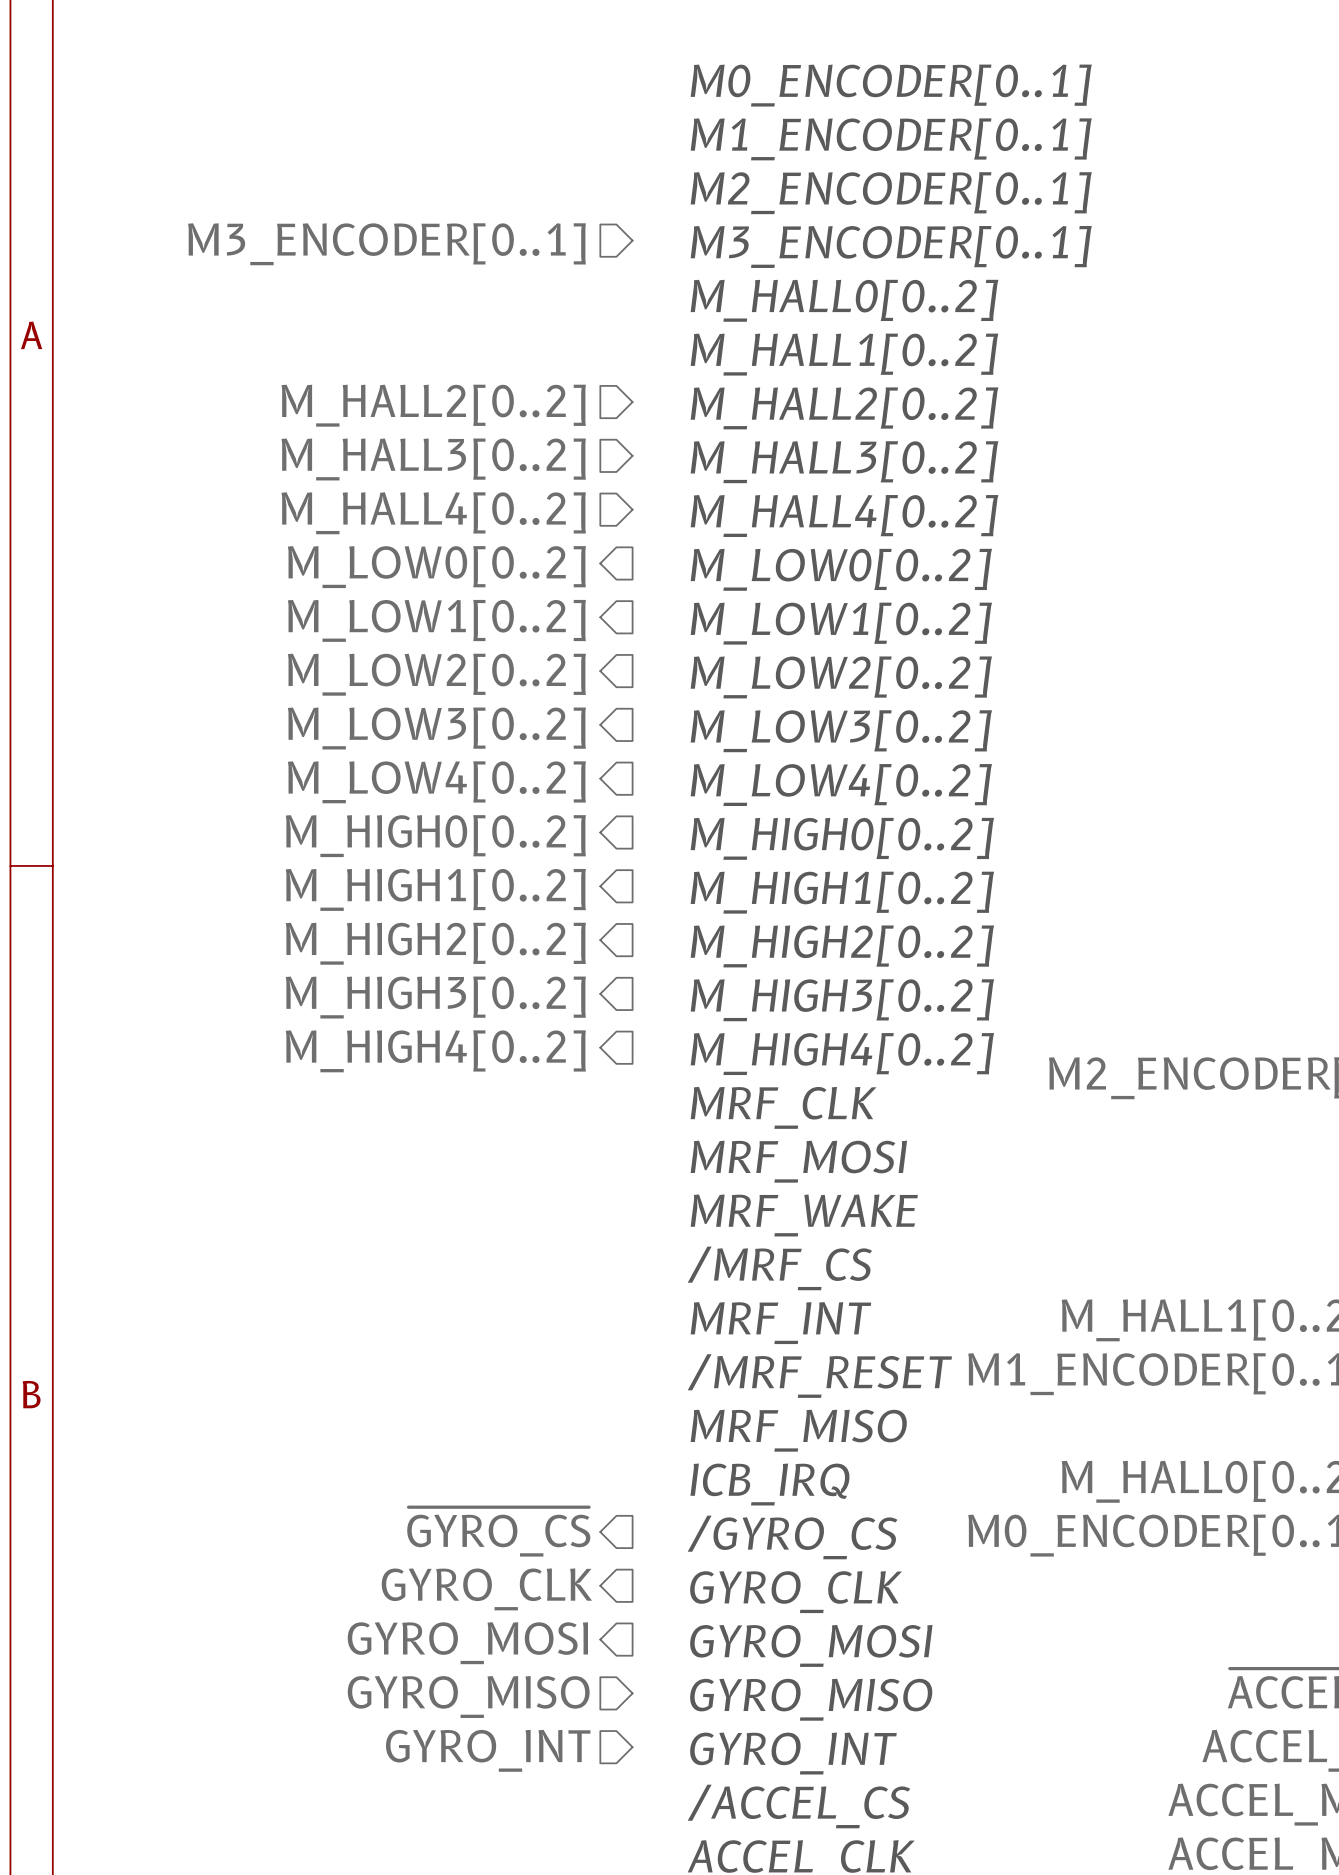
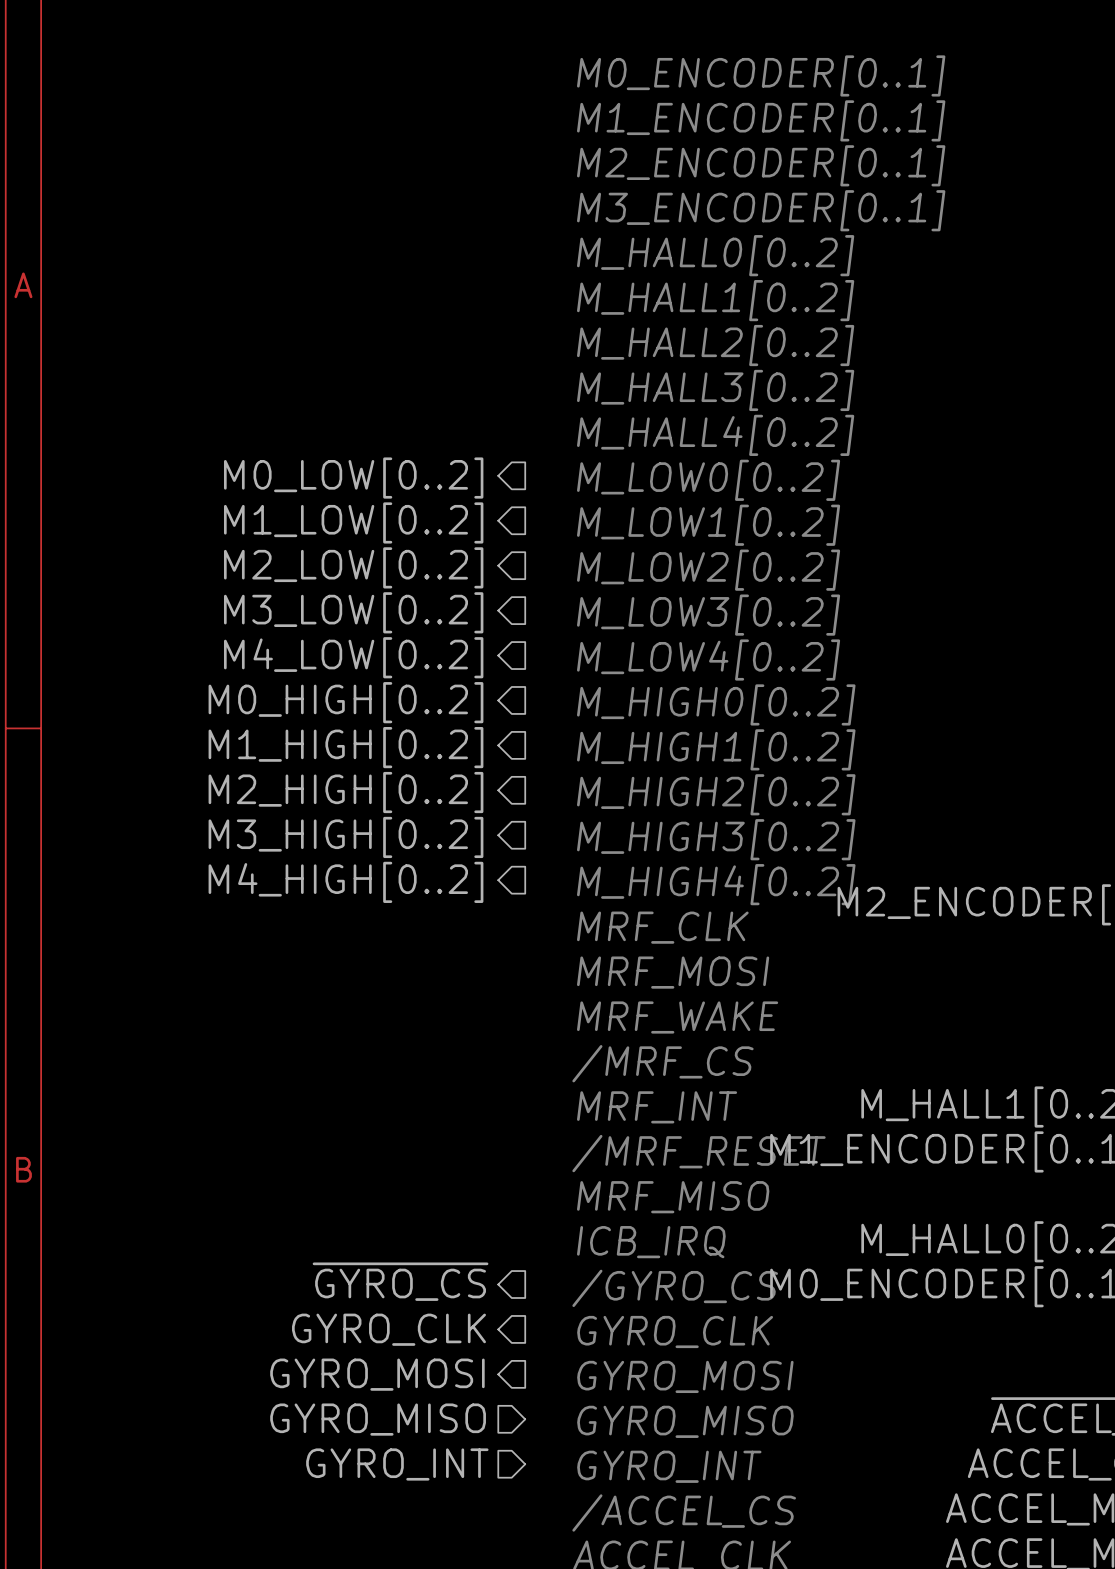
hierarchical label: M3_ENCODER[0..1] (386, 244) -> none
hierarchical label: M_HALL2[0..2] (433, 405) -> none
hierarchical label: M_HALL3[0..2] (433, 459) -> none
hierarchical label: M_HALL4[0..2] (433, 513) -> none
hierarchical label: M_LOW0[0..2] (436, 567) -> M0_LOW[0..2] (353, 478)
hierarchical label: M_LOW1[0..2] (436, 620) -> M1_LOW[0..2] (353, 522)
hierarchical label: M_LOW2[0..2] (436, 674) -> M2_LOW[0..2] (353, 567)
hierarchical label: M_LOW3[0..2] (436, 728) -> M3_LOW[0..2] (353, 612)
hierarchical label: M_LOW4[0..2] (436, 782) -> M4_LOW[0..2] (353, 657)
hierarchical label: M_HIGH0[0..2] (435, 836) -> M0_HIGH[0..2] (345, 702)
hierarchical label: M_HIGH1[0..2] (435, 889) -> M1_HIGH[0..2] (345, 747)
hierarchical label: M_HIGH2[0..2] (435, 943) -> M2_HIGH[0..2] (345, 792)
hierarchical label: M_HIGH3[0..2] (435, 997) -> M3_HIGH[0..2] (345, 837)
hierarchical label: M_HIGH4[0..2] (435, 1051) -> M4_HIGH[0..2] (345, 882)

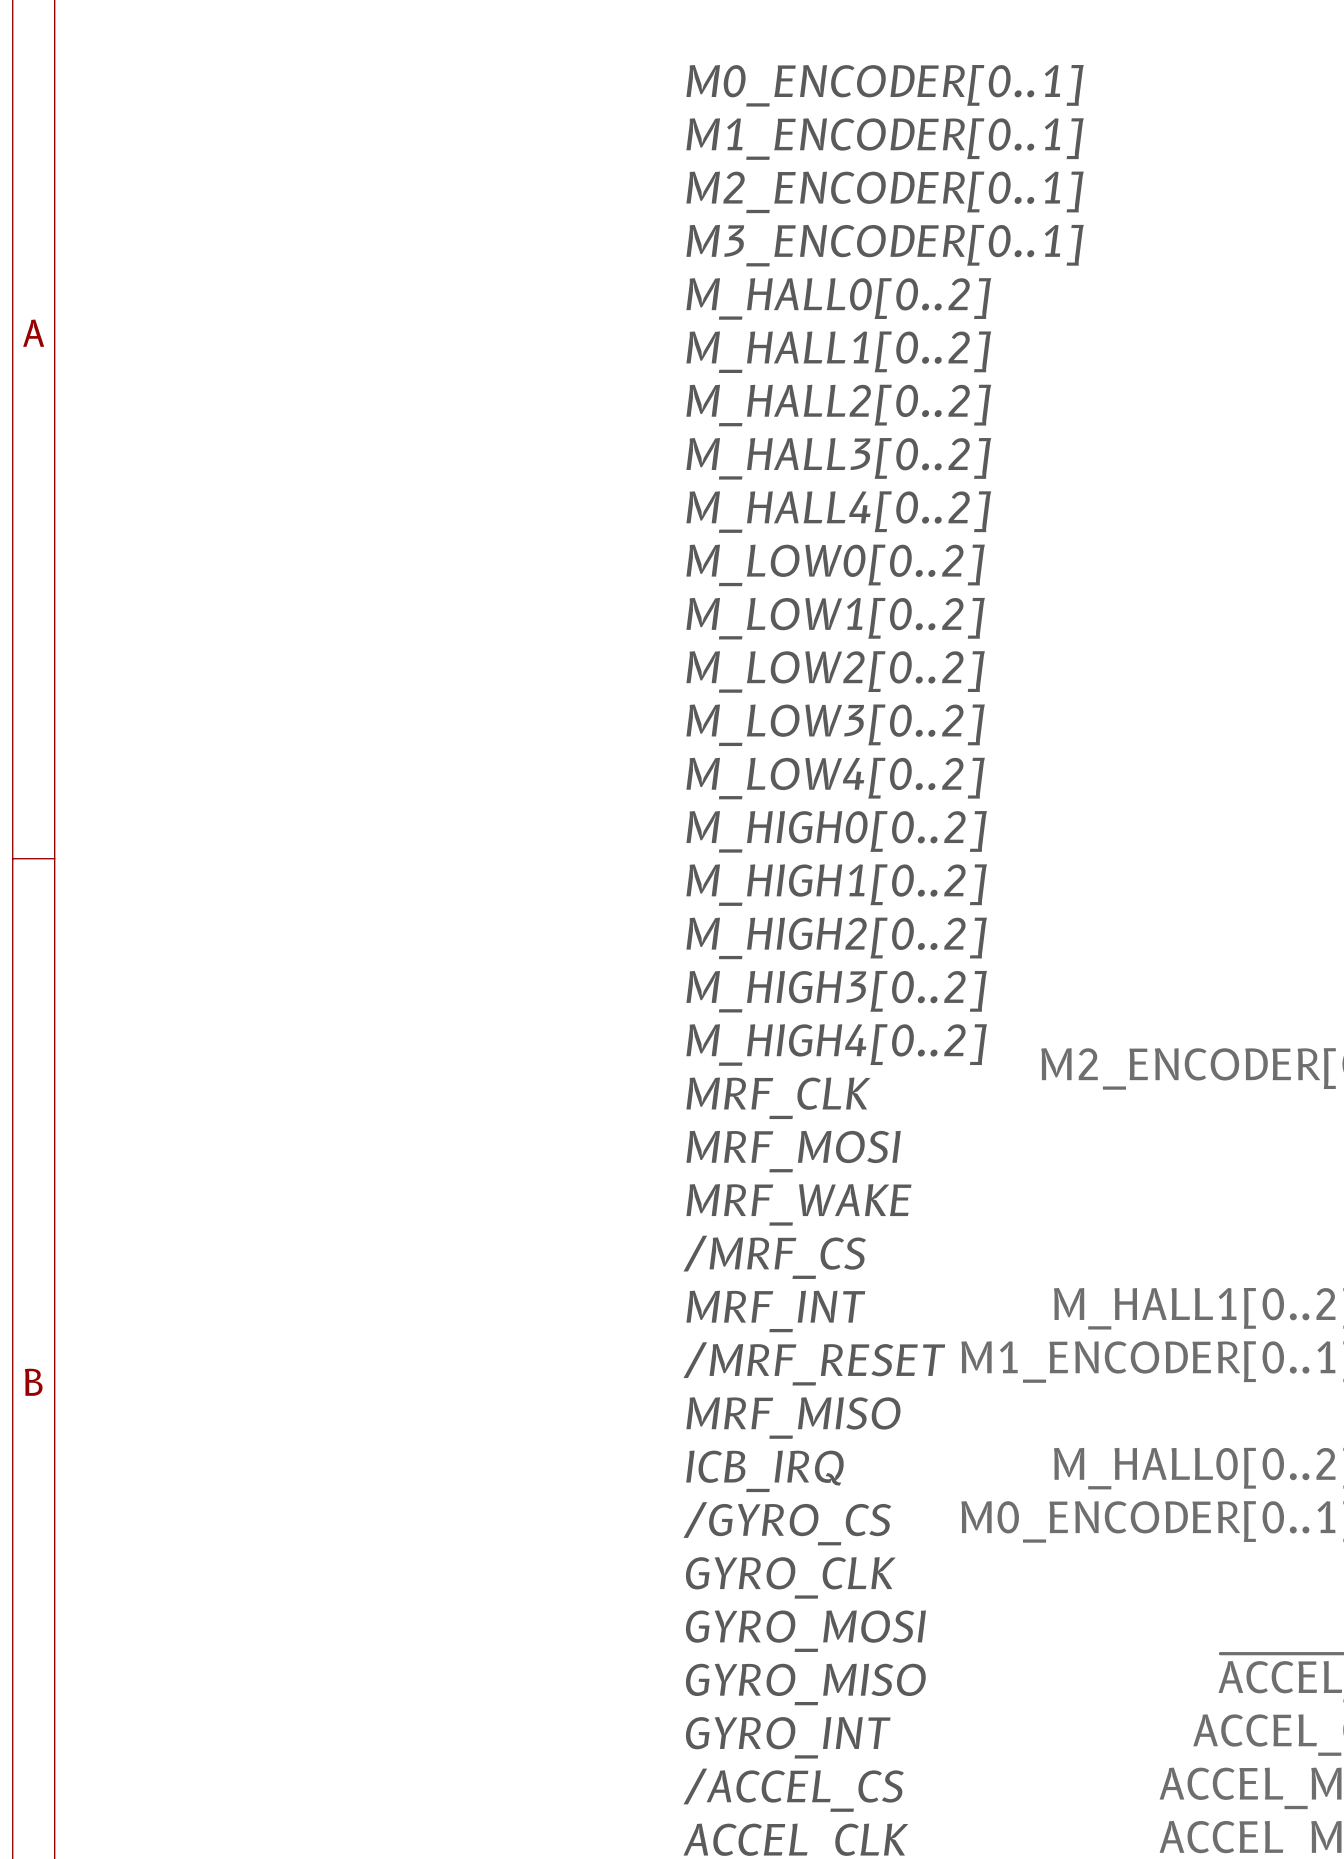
hierarchical label: M0_LOW[0..2] (353, 478) -> none
hierarchical label: M1_LOW[0..2] (353, 522) -> none
hierarchical label: M2_LOW[0..2] (353, 567) -> none
hierarchical label: M3_LOW[0..2] (353, 612) -> none
hierarchical label: M4_LOW[0..2] (353, 657) -> none
hierarchical label: M0_HIGH[0..2] (345, 702) -> none
hierarchical label: M1_HIGH[0..2] (345, 747) -> none
hierarchical label: M2_HIGH[0..2] (345, 792) -> none
hierarchical label: M3_HIGH[0..2] (345, 837) -> none
hierarchical label: M4_HIGH[0..2] (345, 882) -> none
hierarchical label: ~{GYRO_CS} (400, 1281) -> none
hierarchical label: GYRO_CLK (388, 1329) -> none
hierarchical label: GYRO_MOSI (377, 1374) -> none
hierarchical label: GYRO_MISO (378, 1419) -> none
hierarchical label: GYRO_INT (397, 1464) -> none

